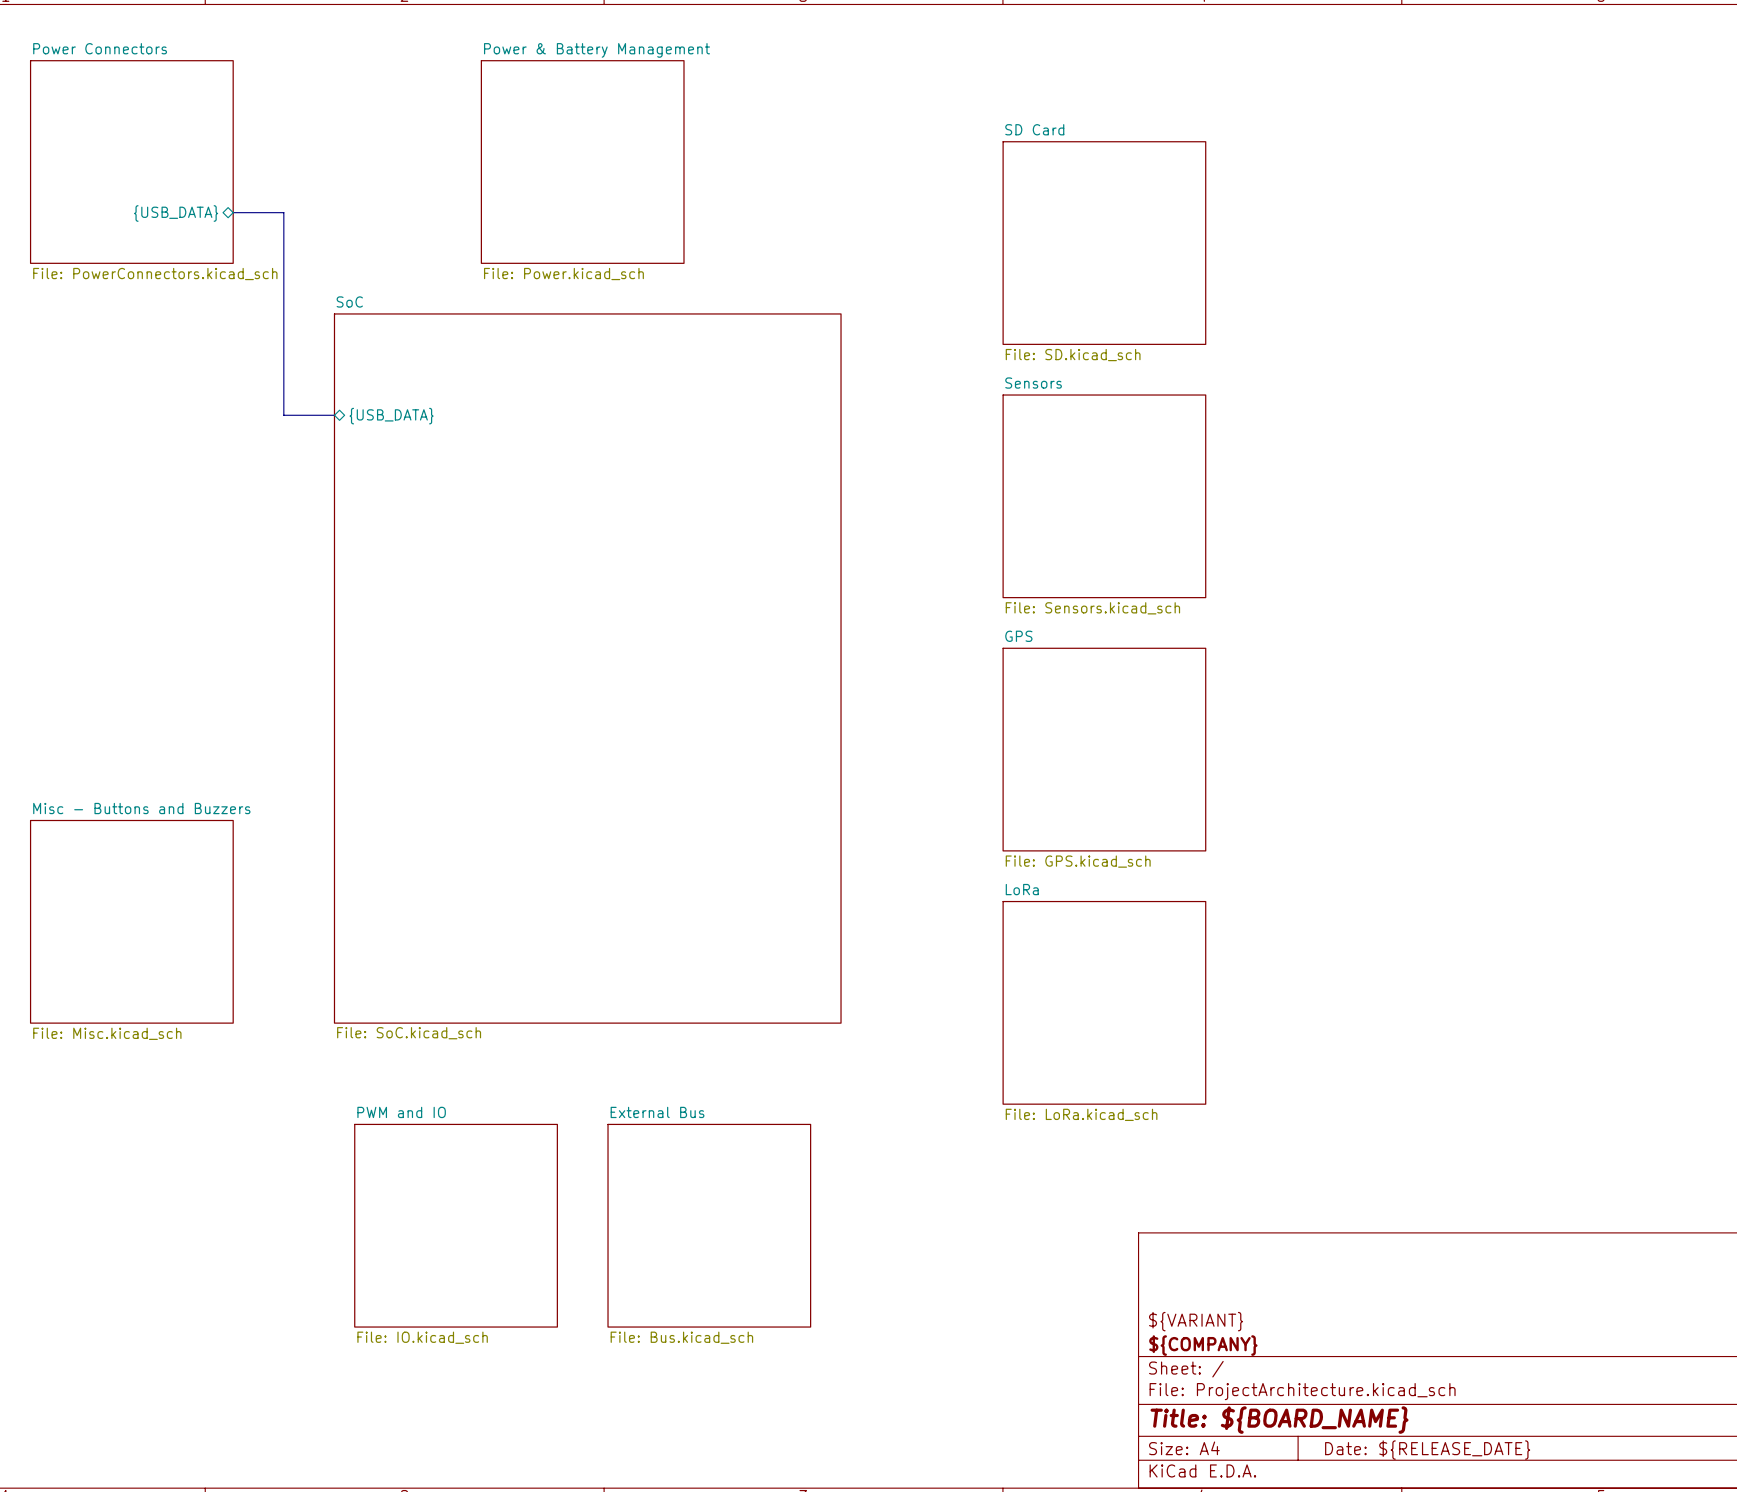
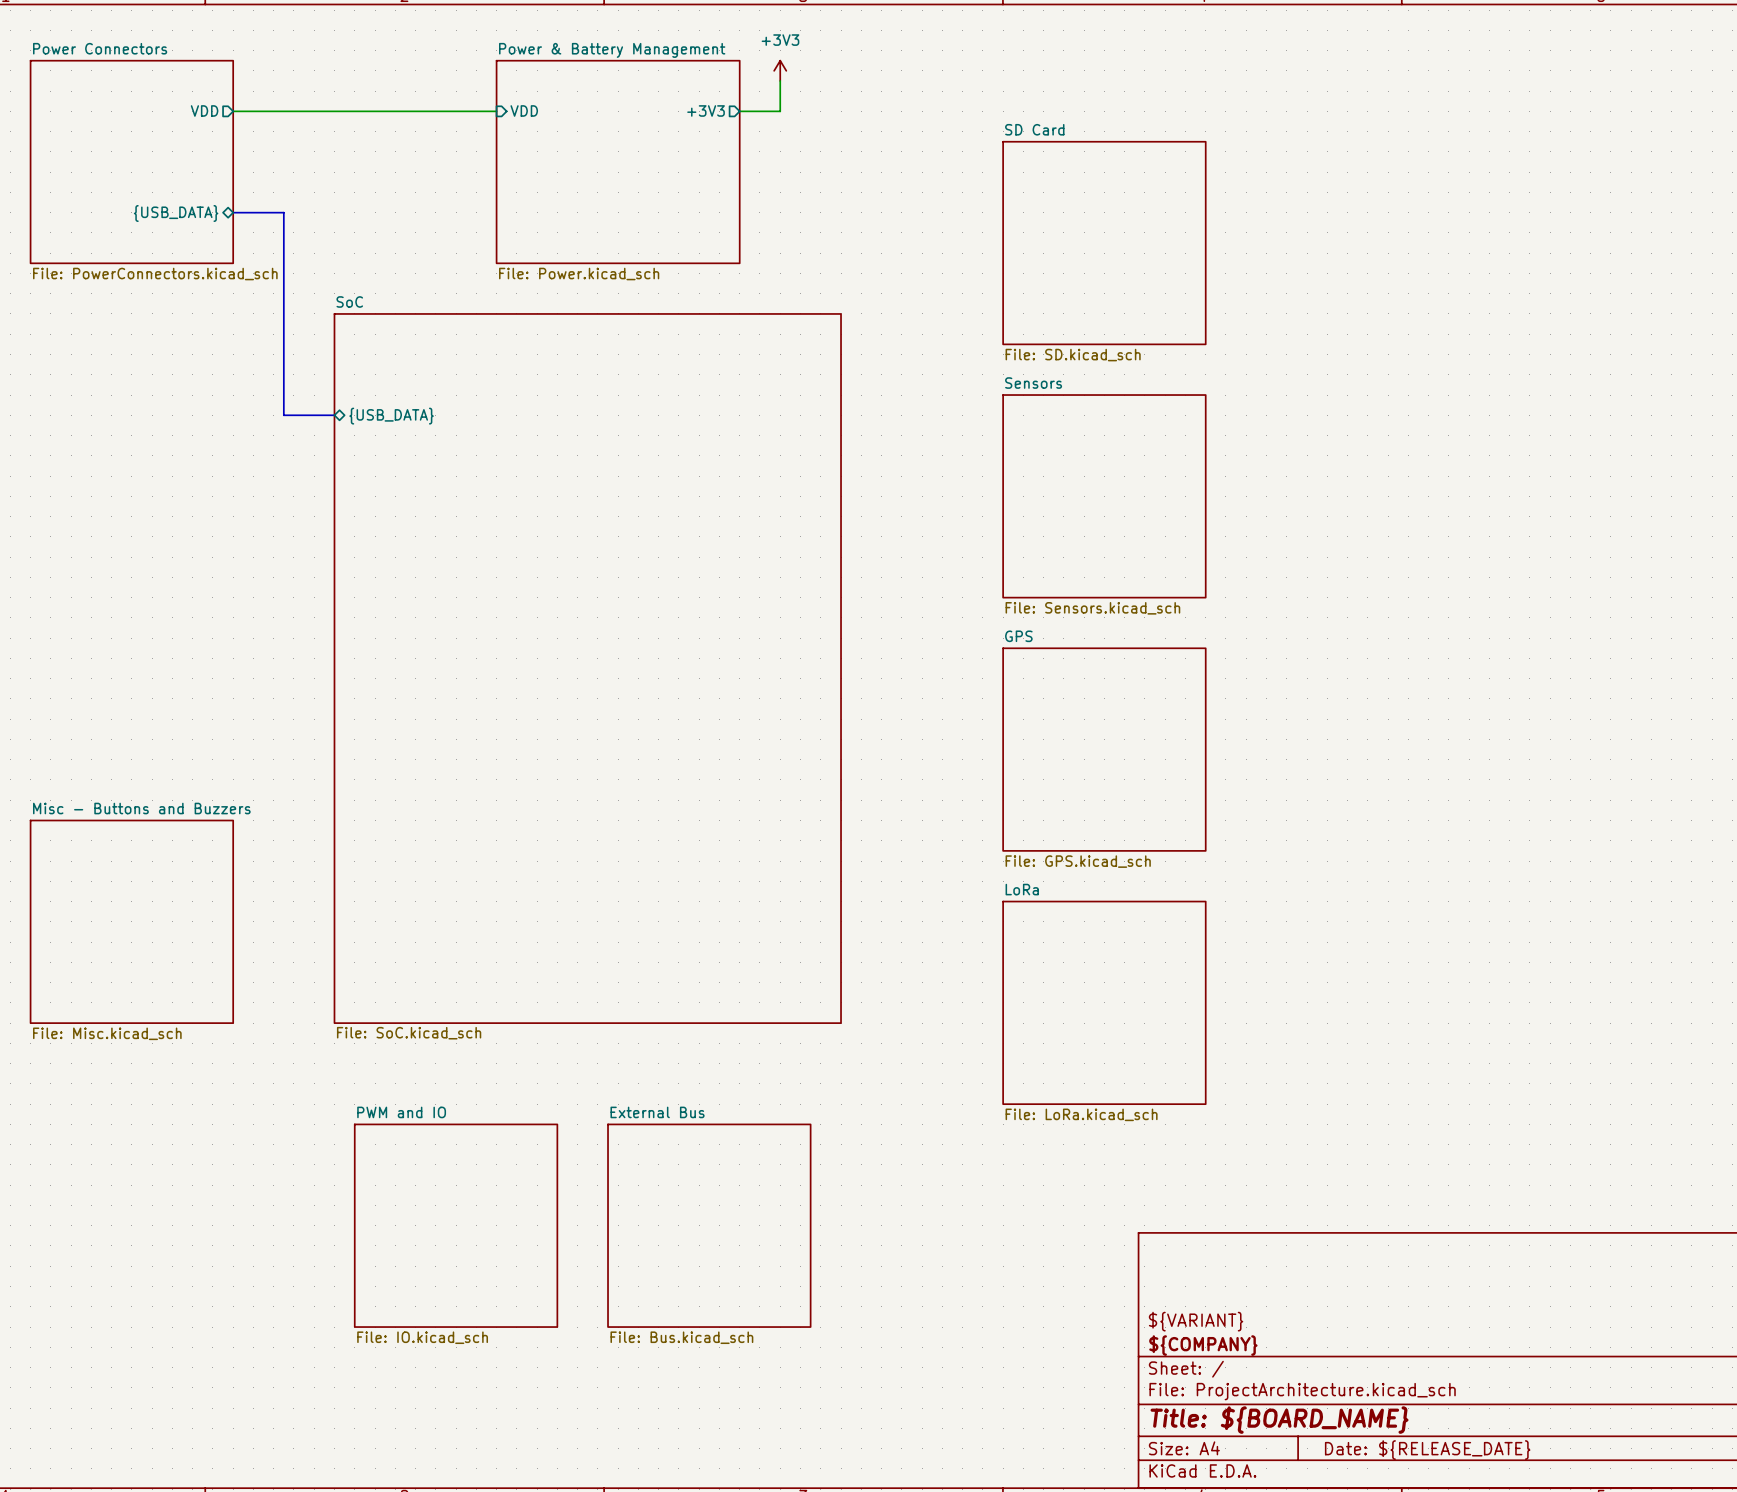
power symbol: none -> +3V3 (780, 70)
wire: none -> (780, 80) (780, 111) (739, 111)
sheet pin: none -> VDD (204, 110)
sheet pin: none -> VDD (524, 110)
sheet pin: none -> +3V3 (706, 110)
wire: none -> (233, 111) (496, 111)
sheet Power & Battery Management: File: Power.kicad_sch (582, 162) -> none
sheet Power & Battery Management: none -> File: Power.kicad_sch (618, 162)

